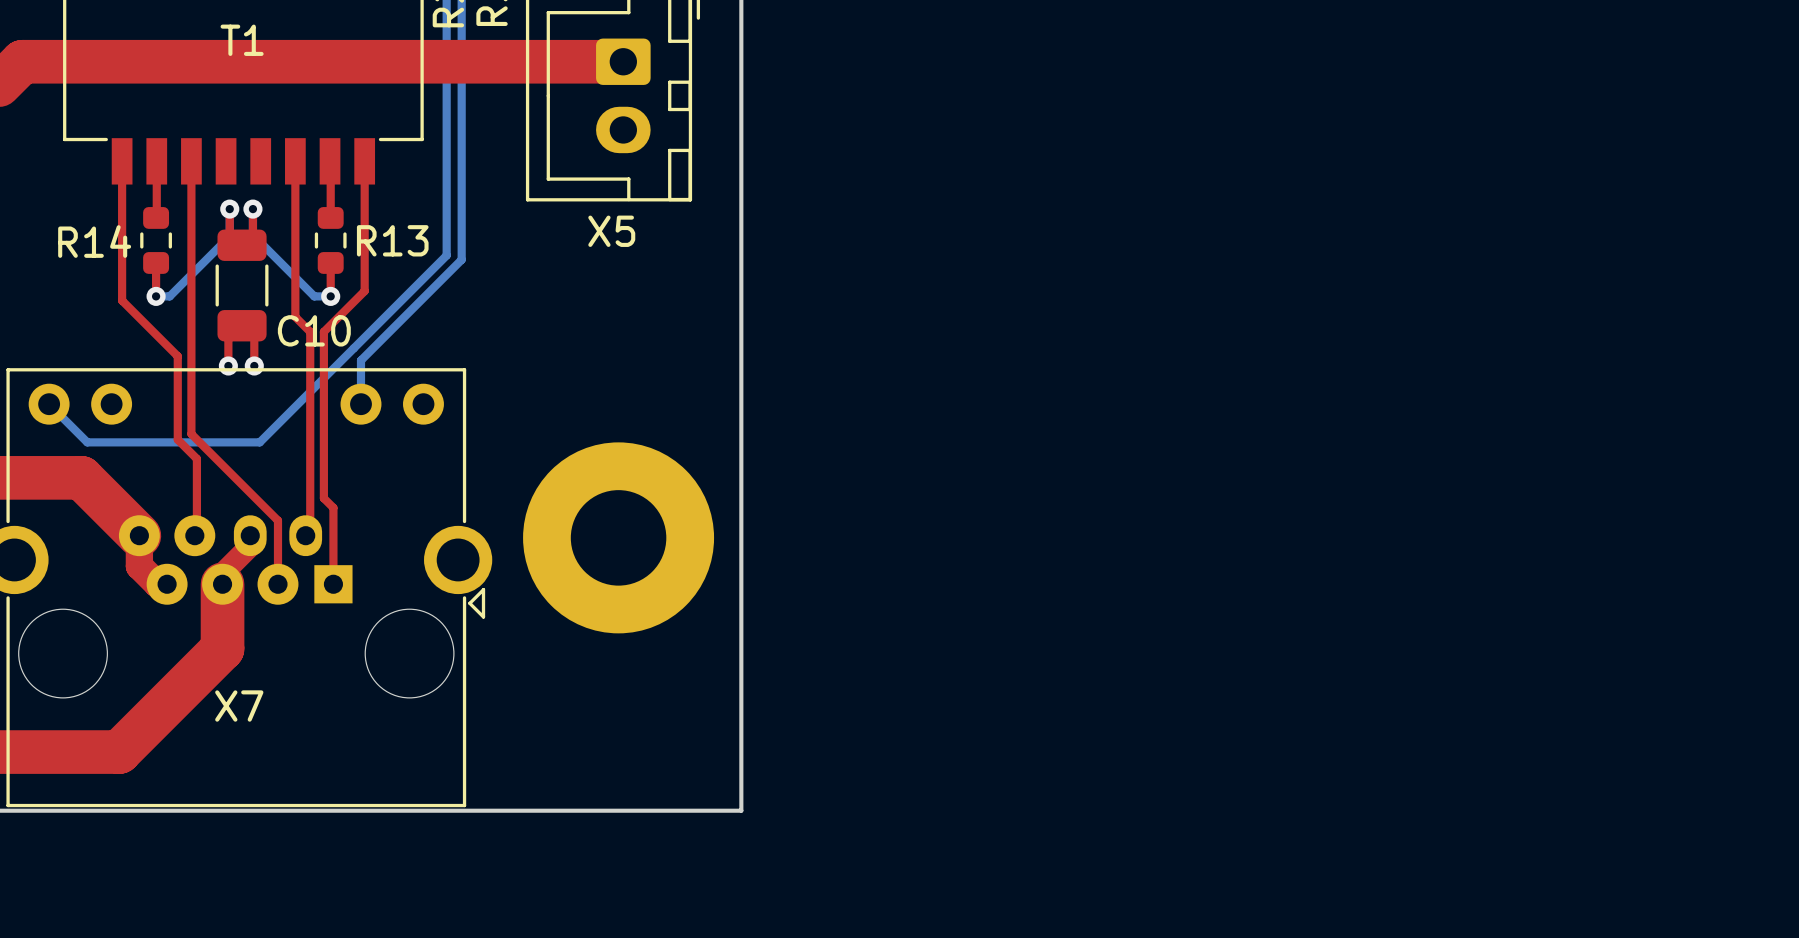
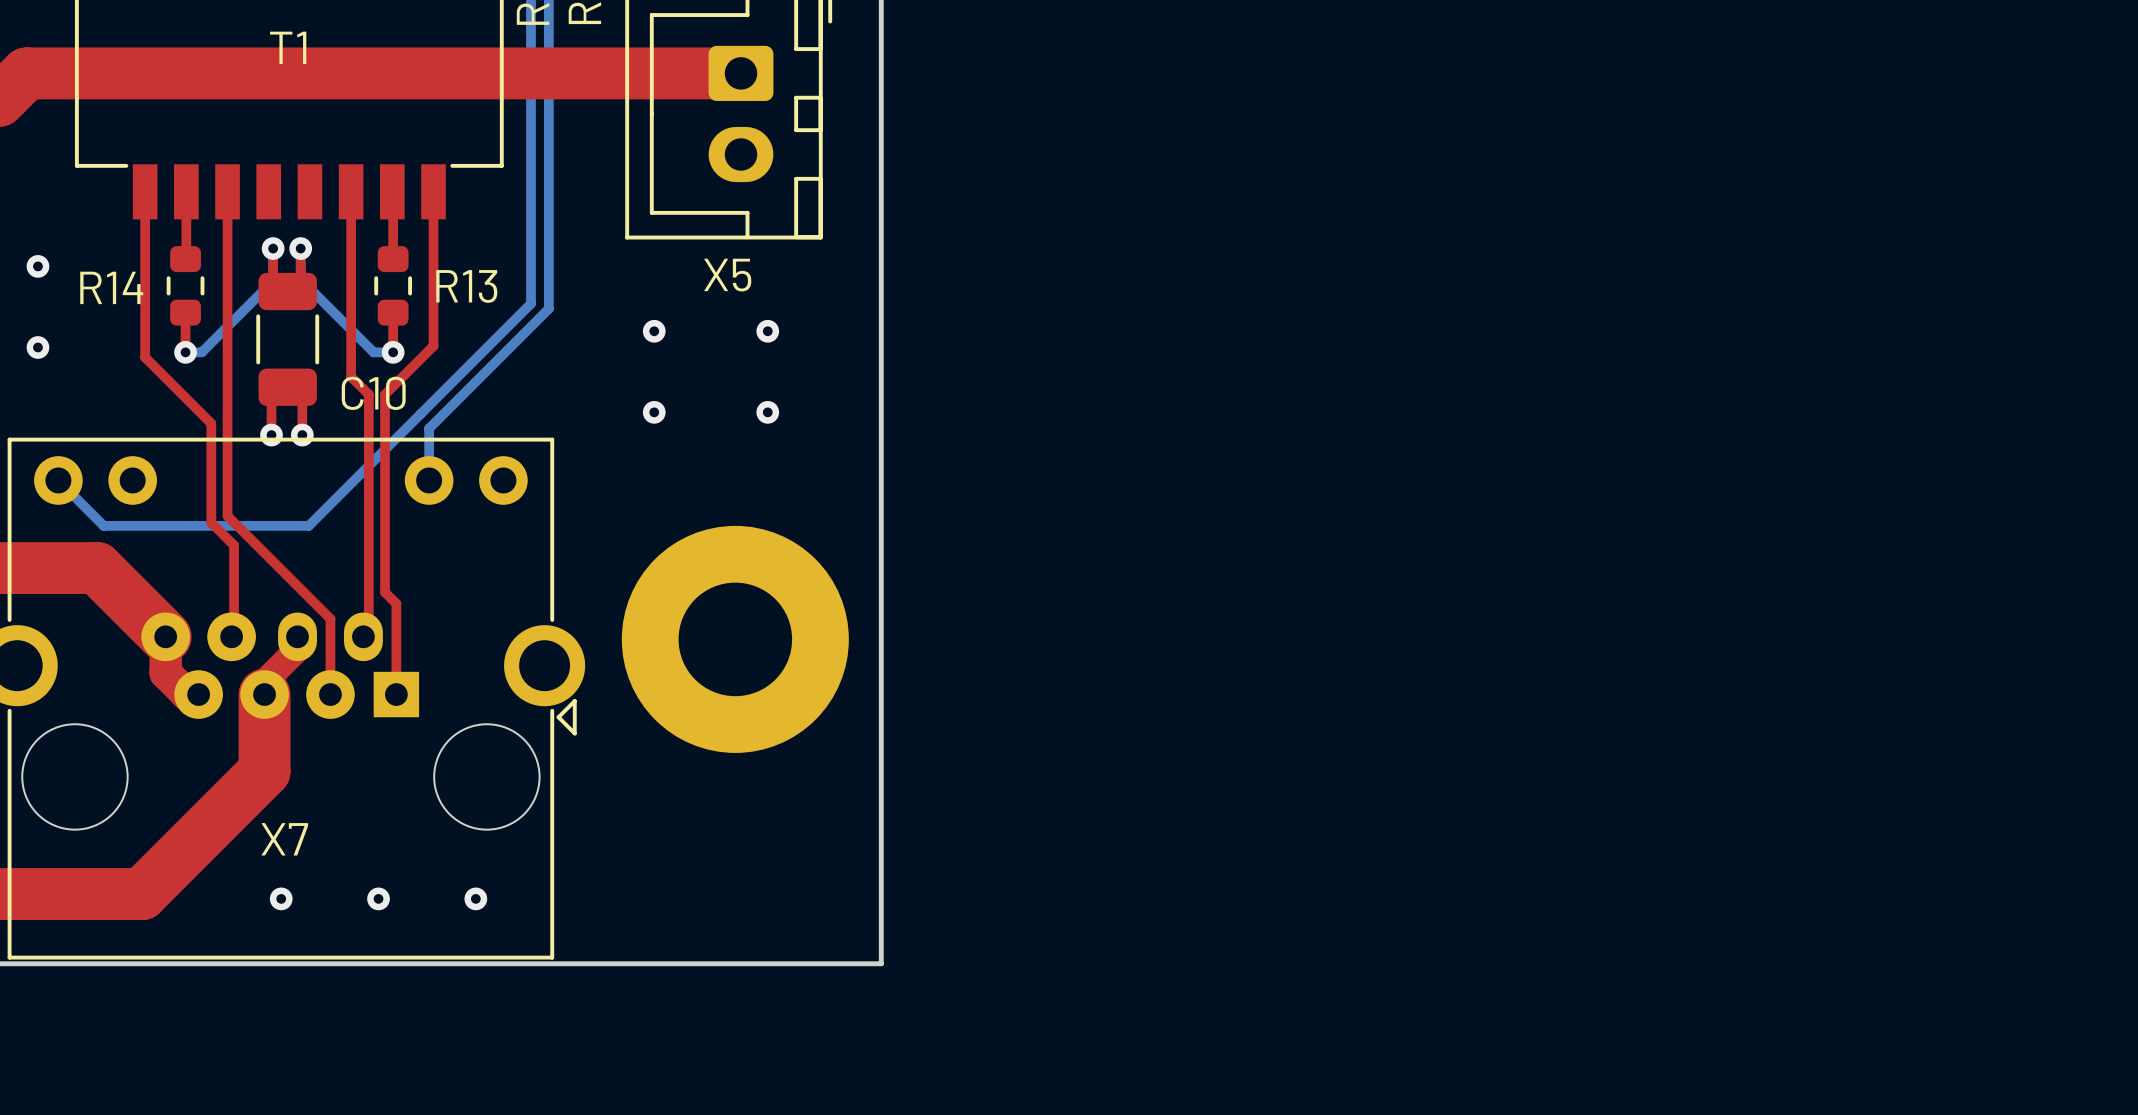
via: none -> (37, 266)
via: none -> (654, 331)
via: none -> (767, 331)
via: none -> (37, 347)
via: none -> (654, 412)
via: none -> (767, 412)
via: none -> (281, 898)
via: none -> (378, 898)
via: none -> (475, 898)

